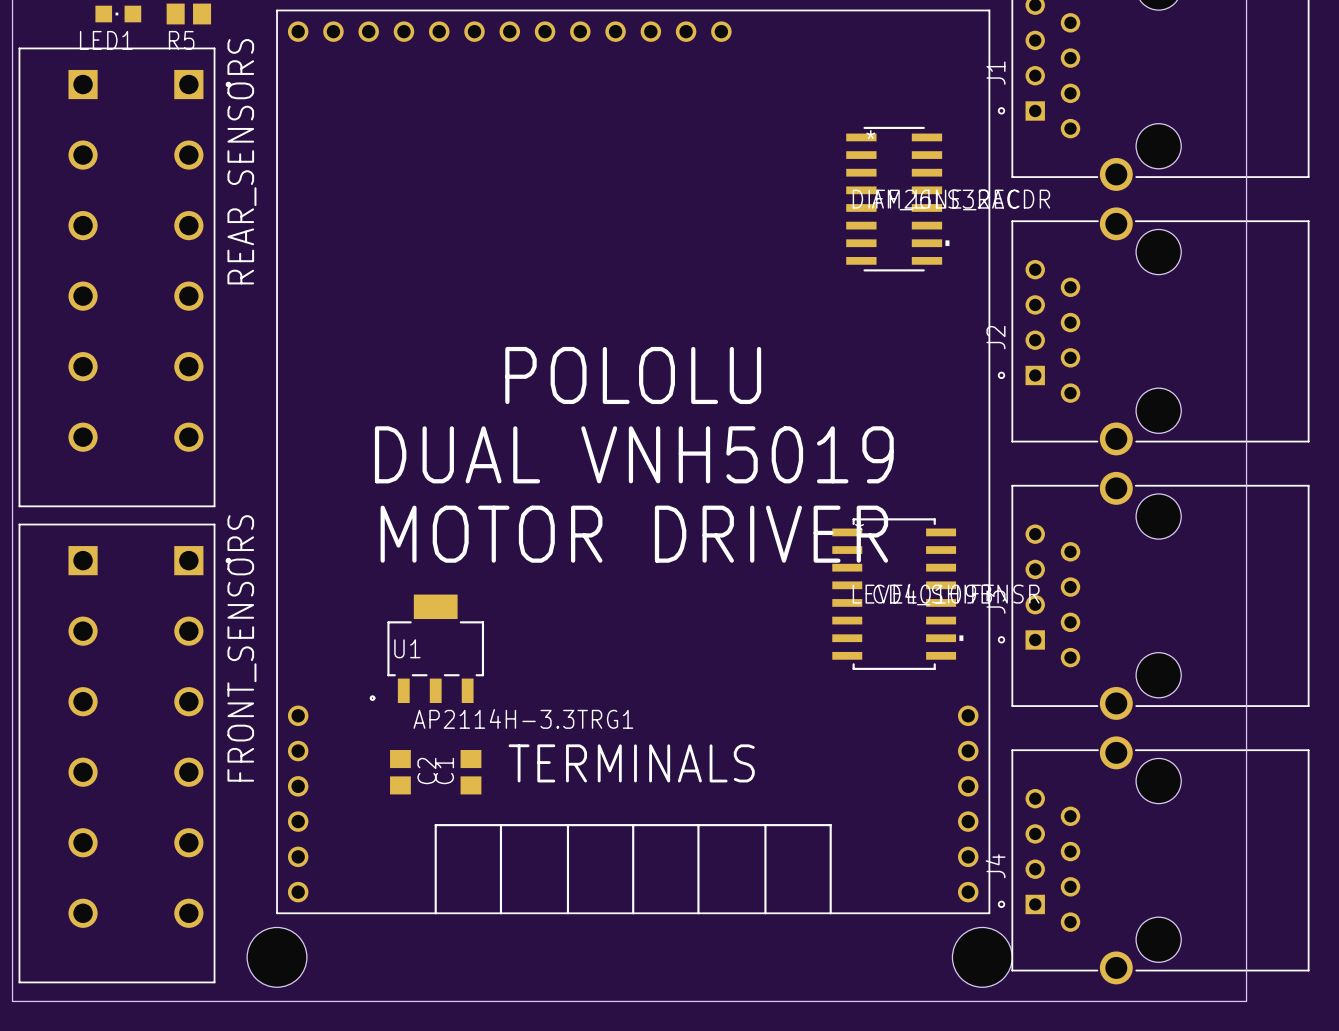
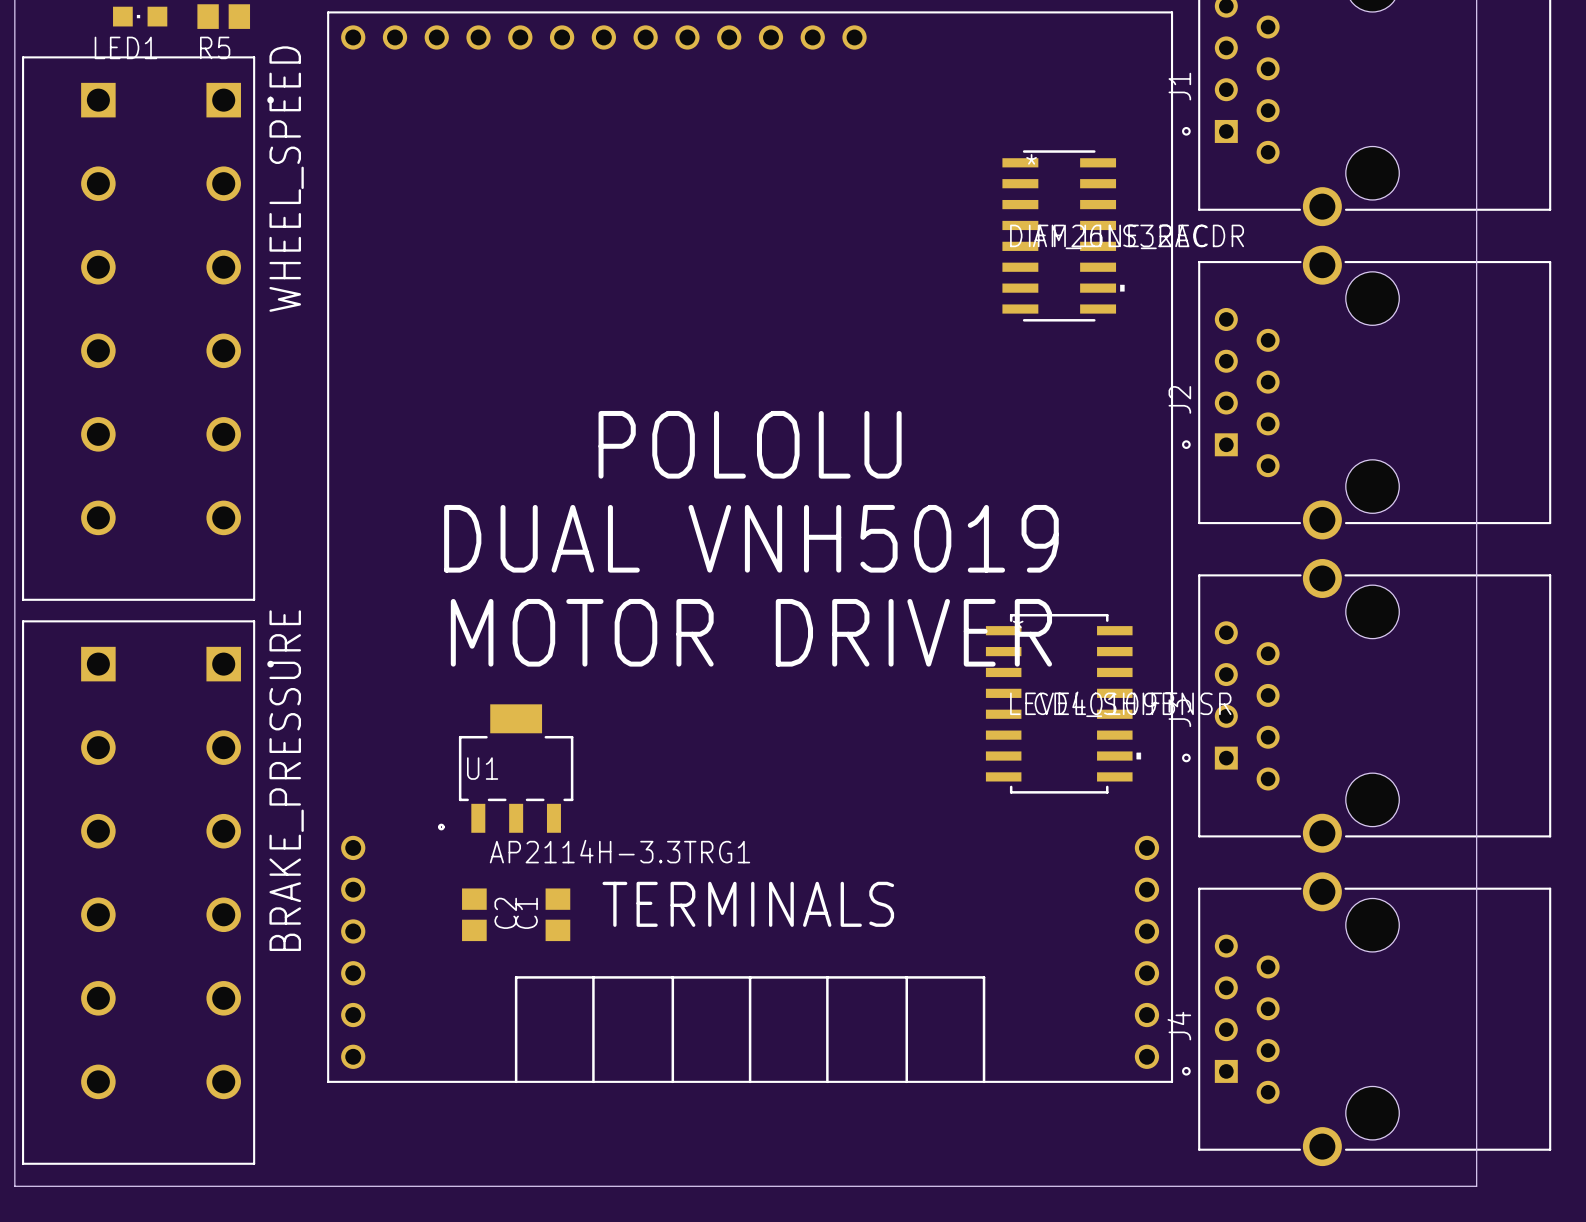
REAR_SENSORS name: REAR_SENSORS (241, 161) -> WHEEL_SPEED (286, 179)
FRONT_SENSORS name: FRONT_SENSORS (241, 648) -> BRAKE_PRESSURE (286, 780)
hole: (277, 957) -> none
hole: (982, 957) -> none

